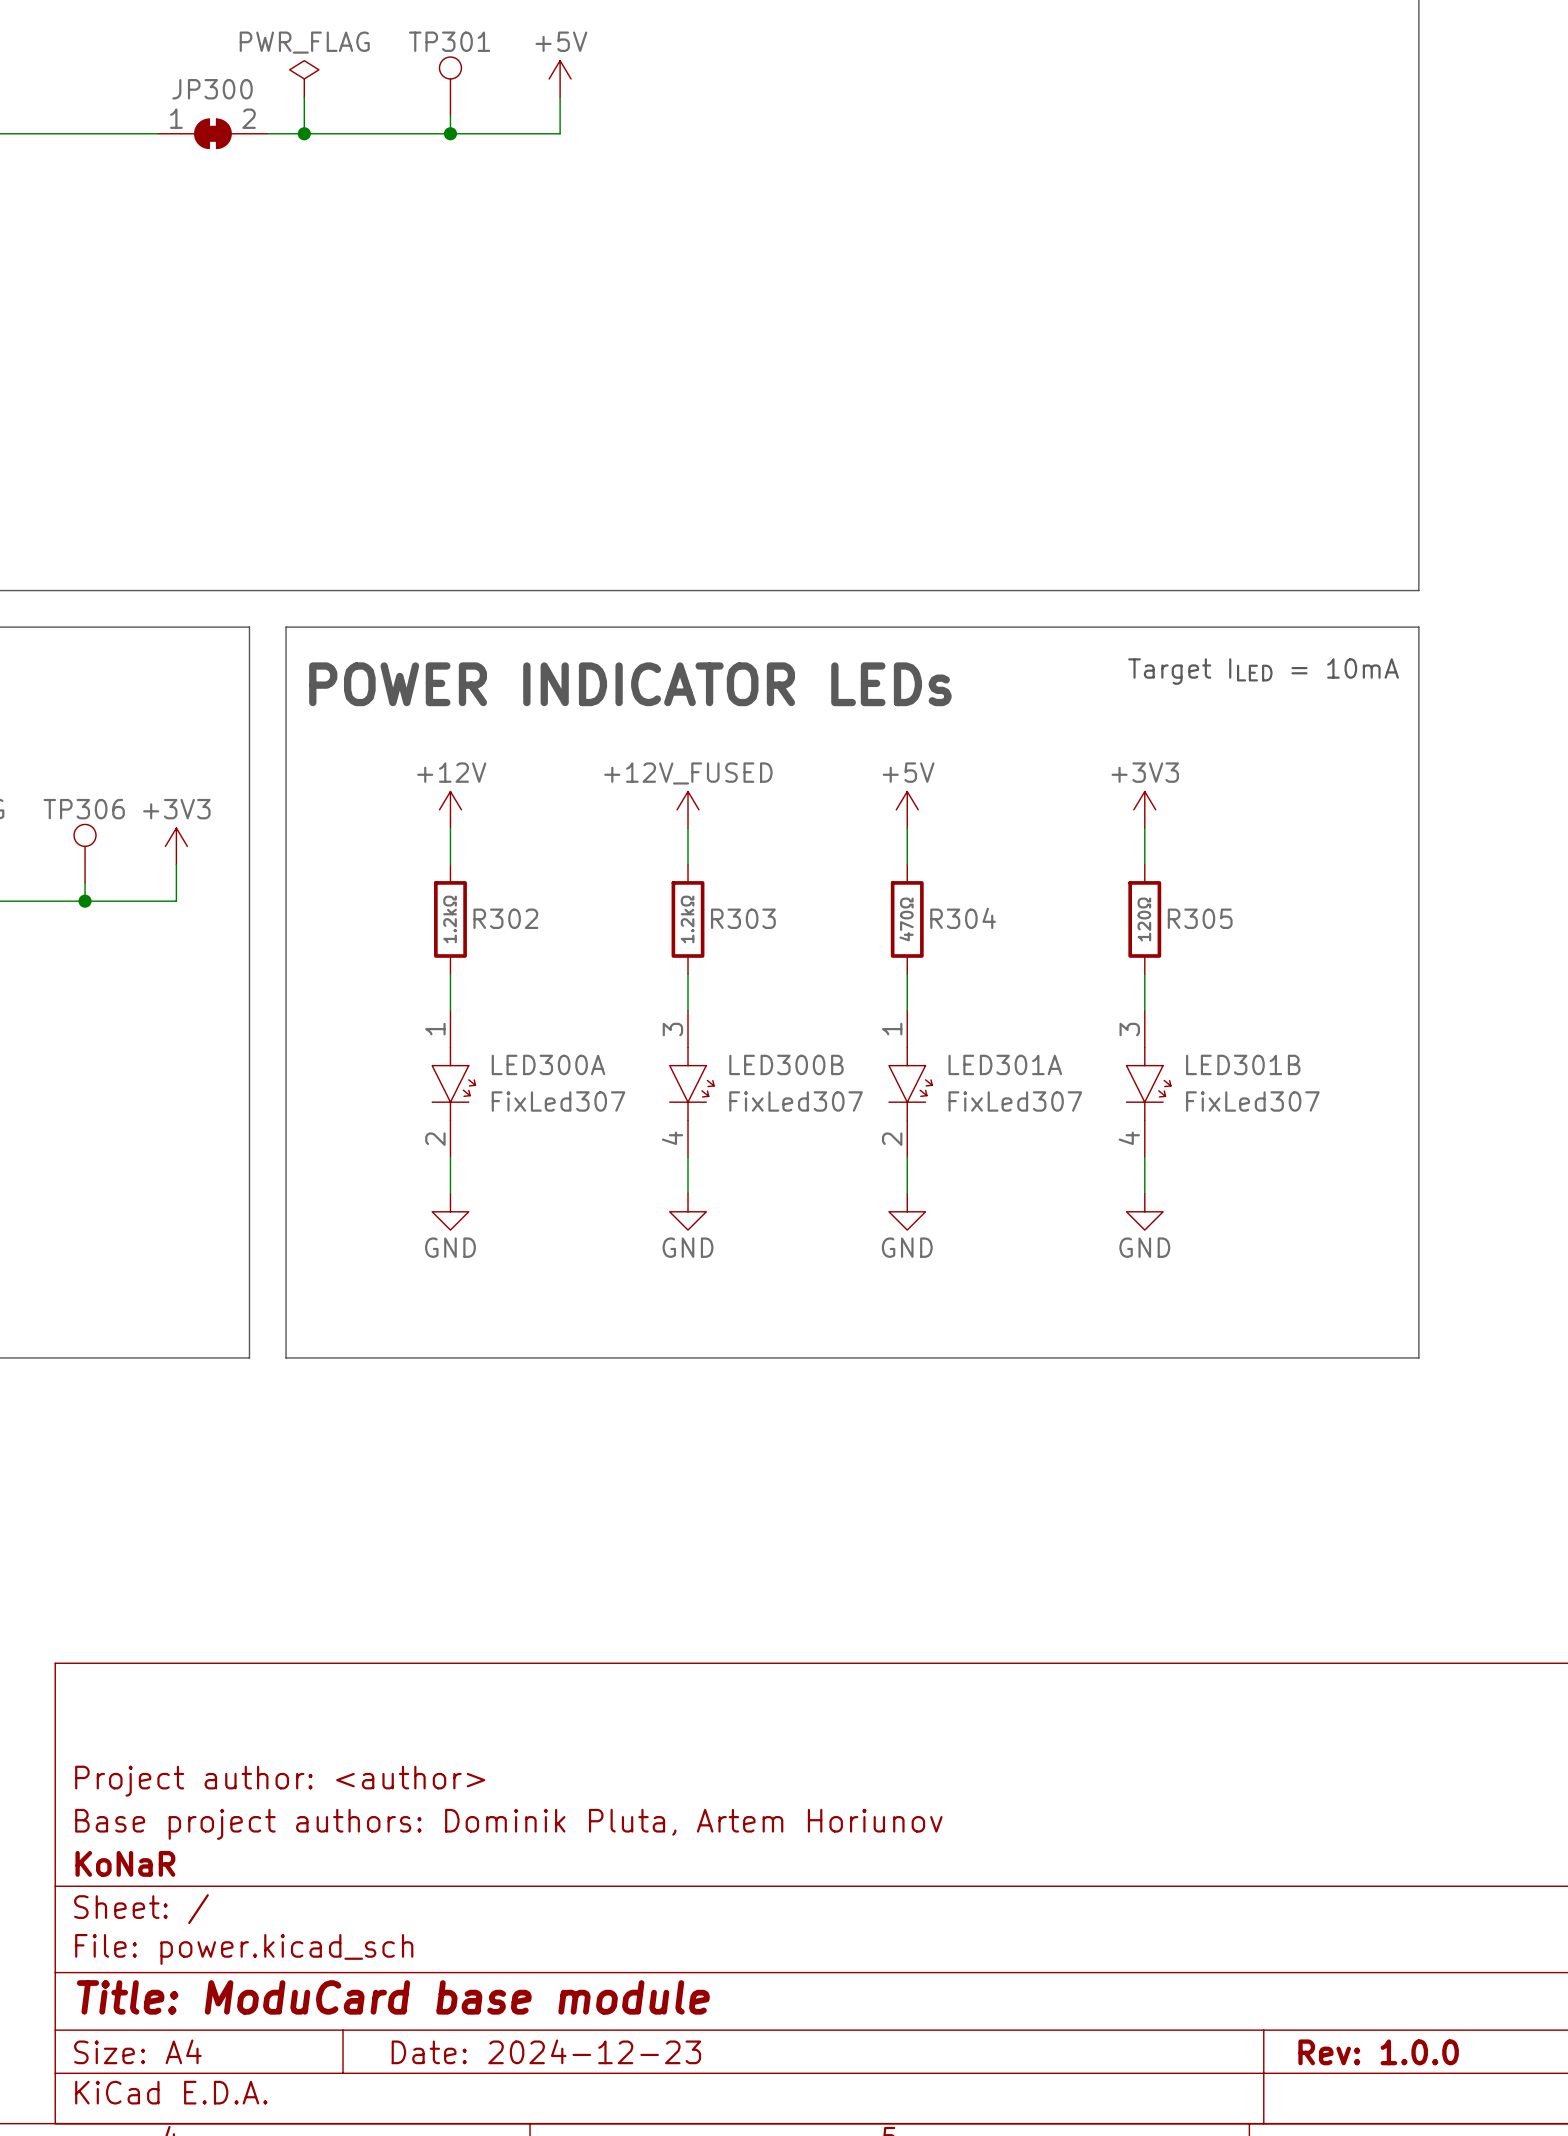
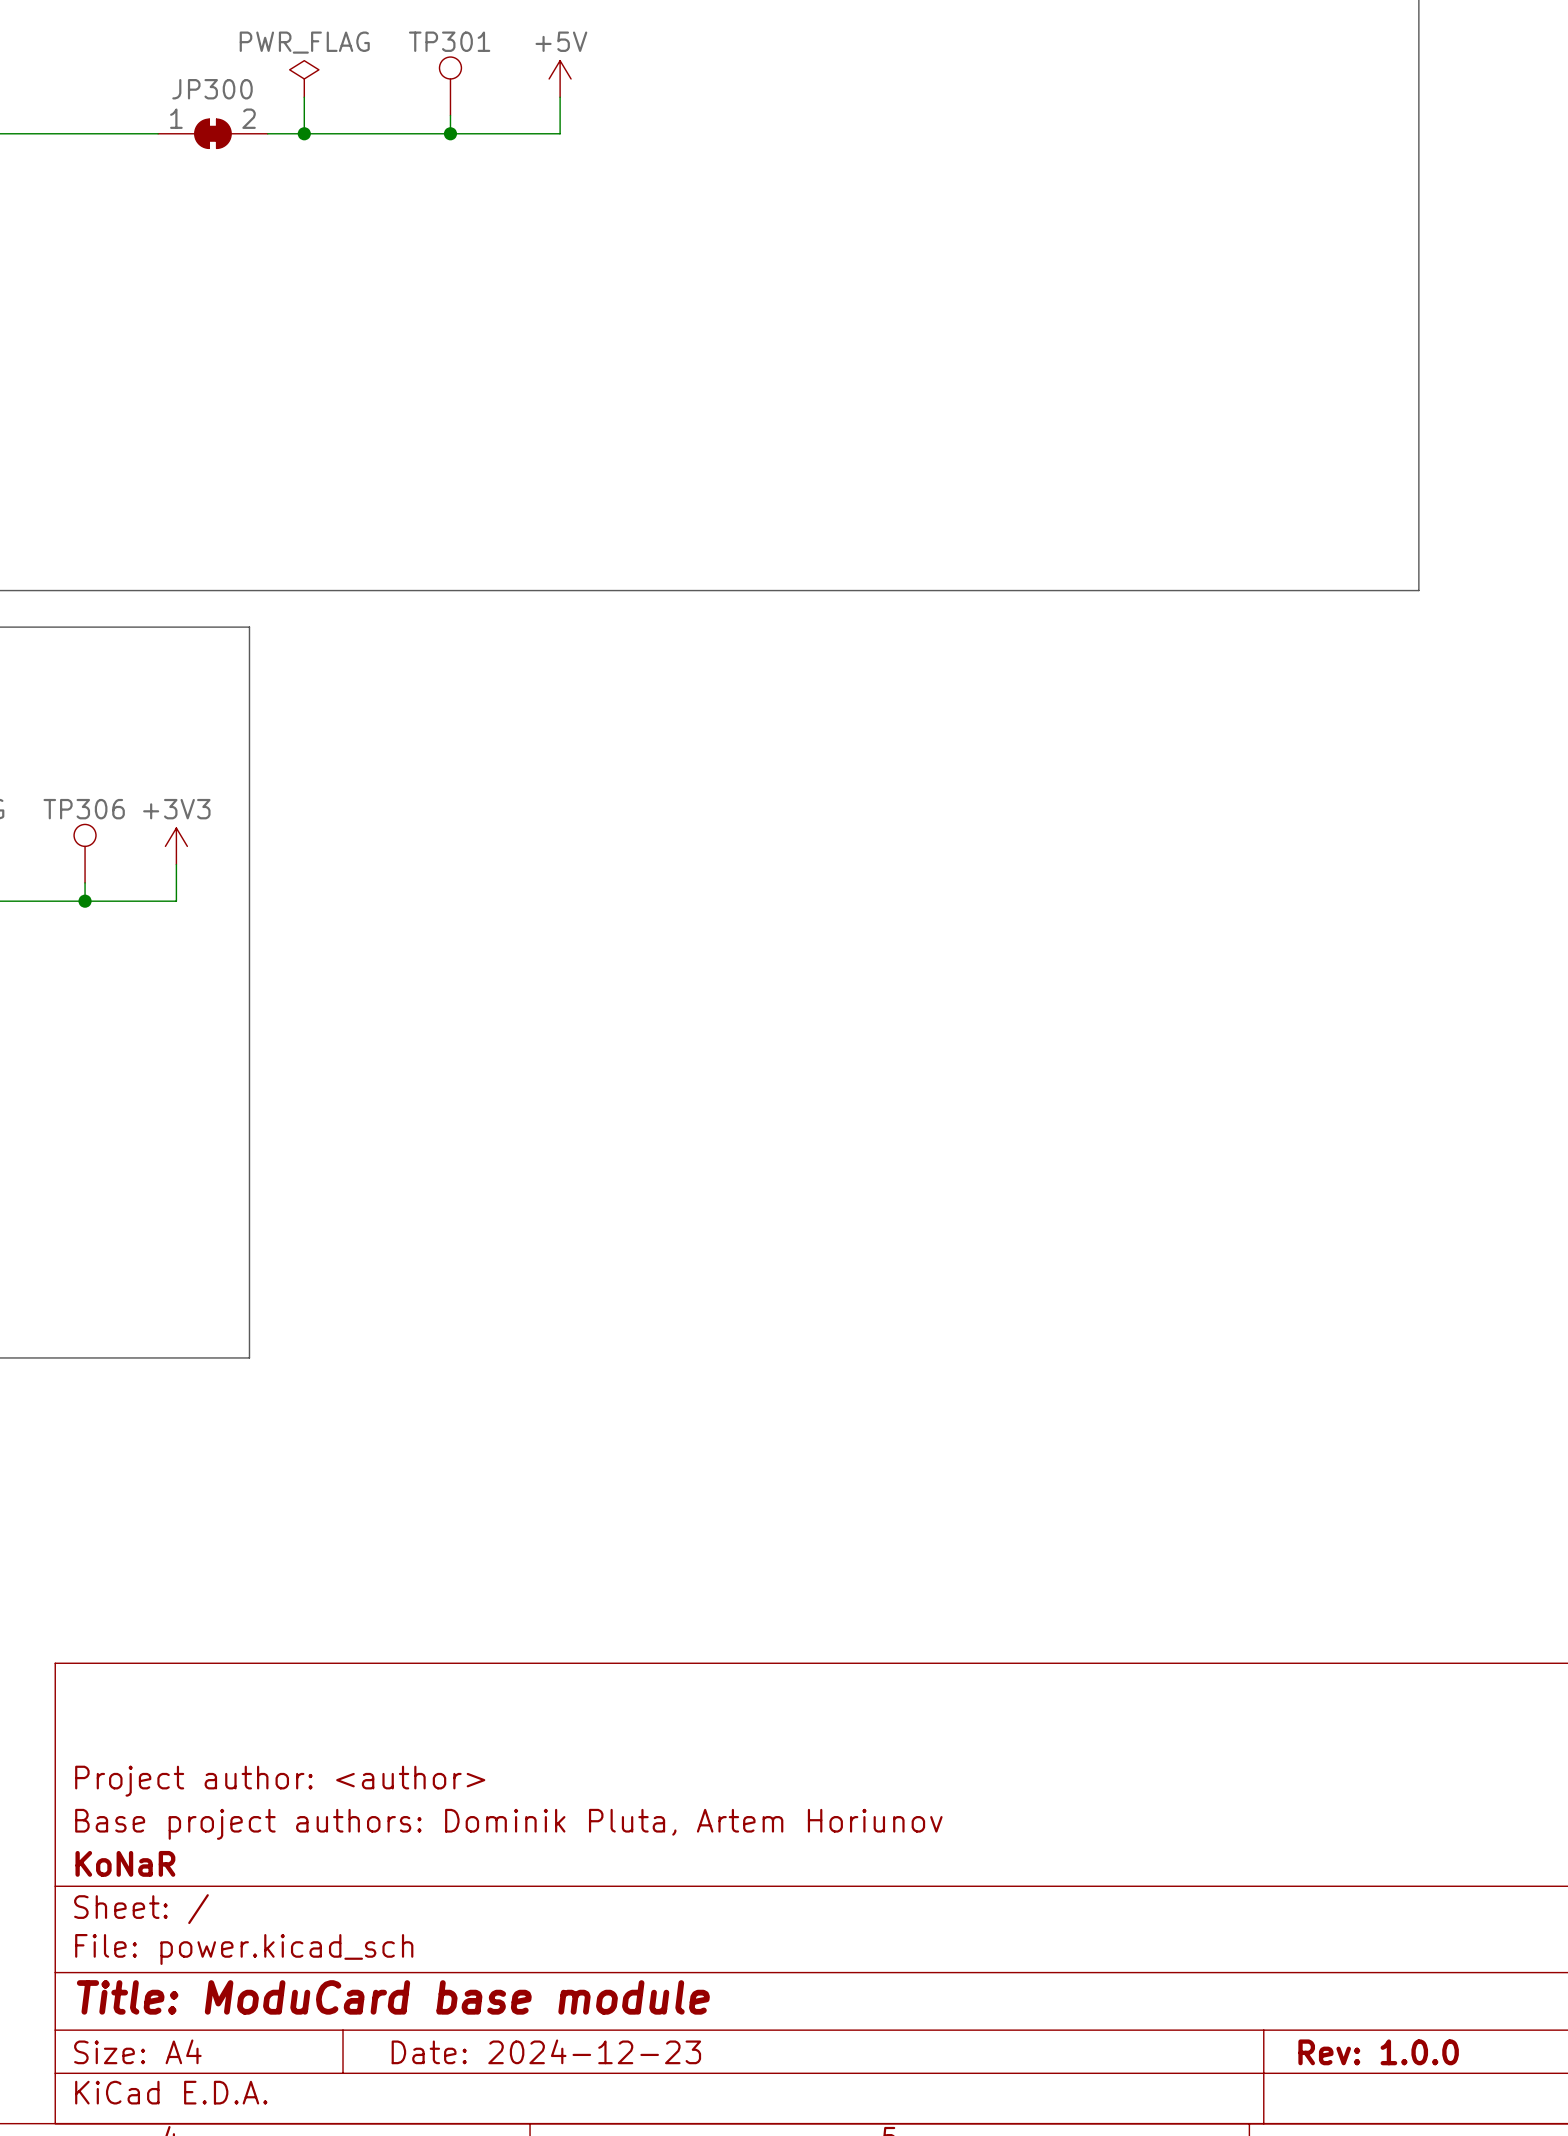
line: (286, 627) (1418, 627) (1418, 1357) (286, 1357) (286, 627) -> none
text: Target ILED = 10mA (1263, 671) -> none
text: POWER INDICATOR LEDs (630, 684) -> none
power symbol: +12V (450, 809) -> none
power symbol: +12V_FUSED (688, 809) -> none
power symbol: +5V (907, 809) -> none
power symbol: +3V3 (1144, 809) -> none
wire: (450, 828) (450, 864) -> none
wire: (688, 828) (688, 864) -> none
wire: (907, 828) (907, 864) -> none
wire: (1144, 828) (1144, 864) -> none
R302: 1.2kΩ (450, 919) -> none
R303: 1.2kΩ (688, 919) -> none
R304: 470Ω (907, 919) -> none
R305: 120Ω (1144, 919) -> none
wire: (450, 974) (450, 1010) -> none
wire: (688, 974) (688, 1010) -> none
wire: (907, 974) (907, 1010) -> none
wire: (1144, 974) (1144, 1010) -> none
LED300A: FixLed307 (453, 1083) -> none
LED300B: FixLed307 (691, 1083) -> none
LED301A: FixLed307 (910, 1083) -> none
LED301B: FixLed307 (1148, 1083) -> none
wire: (450, 1156) (450, 1193) -> none
wire: (688, 1156) (688, 1193) -> none
wire: (907, 1156) (907, 1193) -> none
wire: (1144, 1156) (1144, 1193) -> none
power symbol: GND (450, 1211) -> none
power symbol: GND (688, 1211) -> none
power symbol: GND (907, 1211) -> none
power symbol: GND (1144, 1211) -> none

